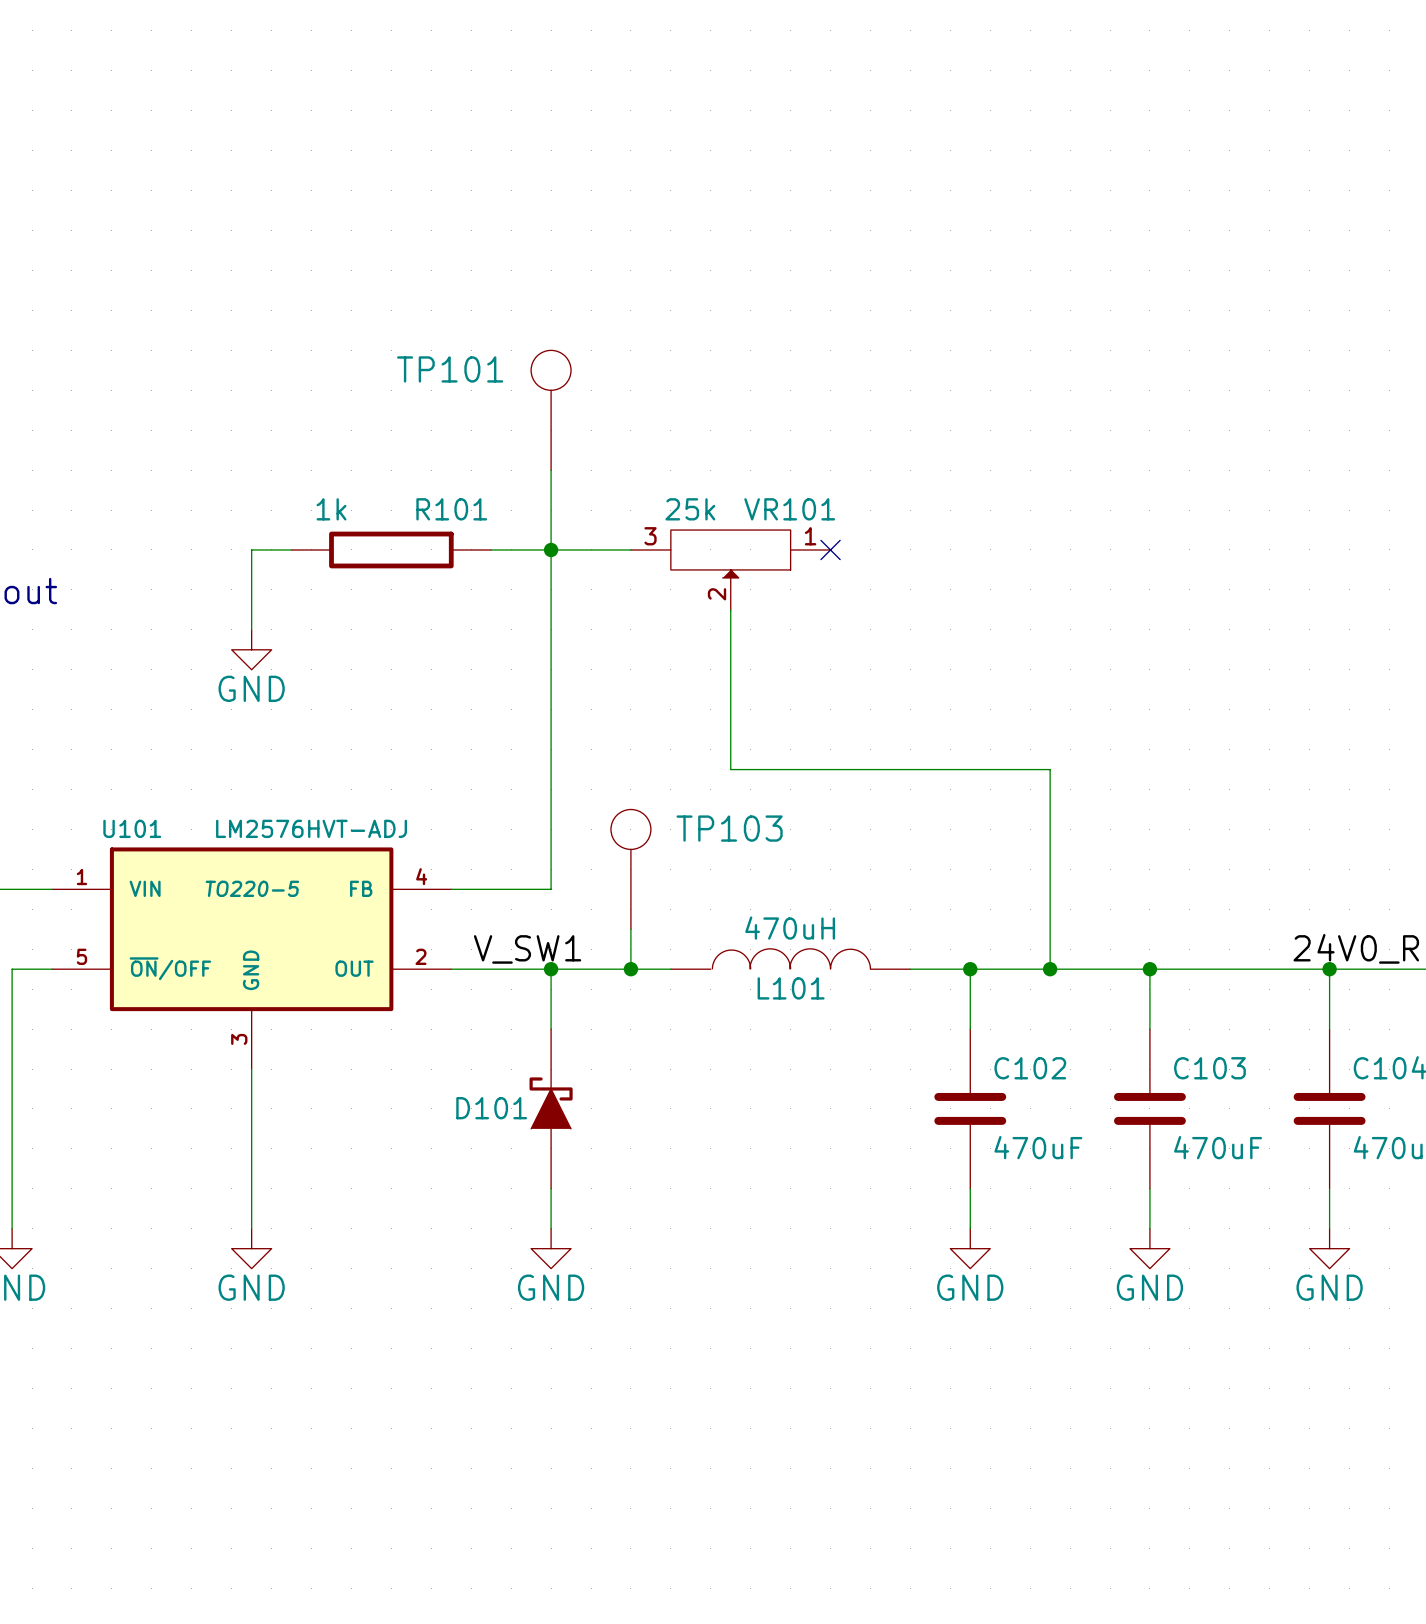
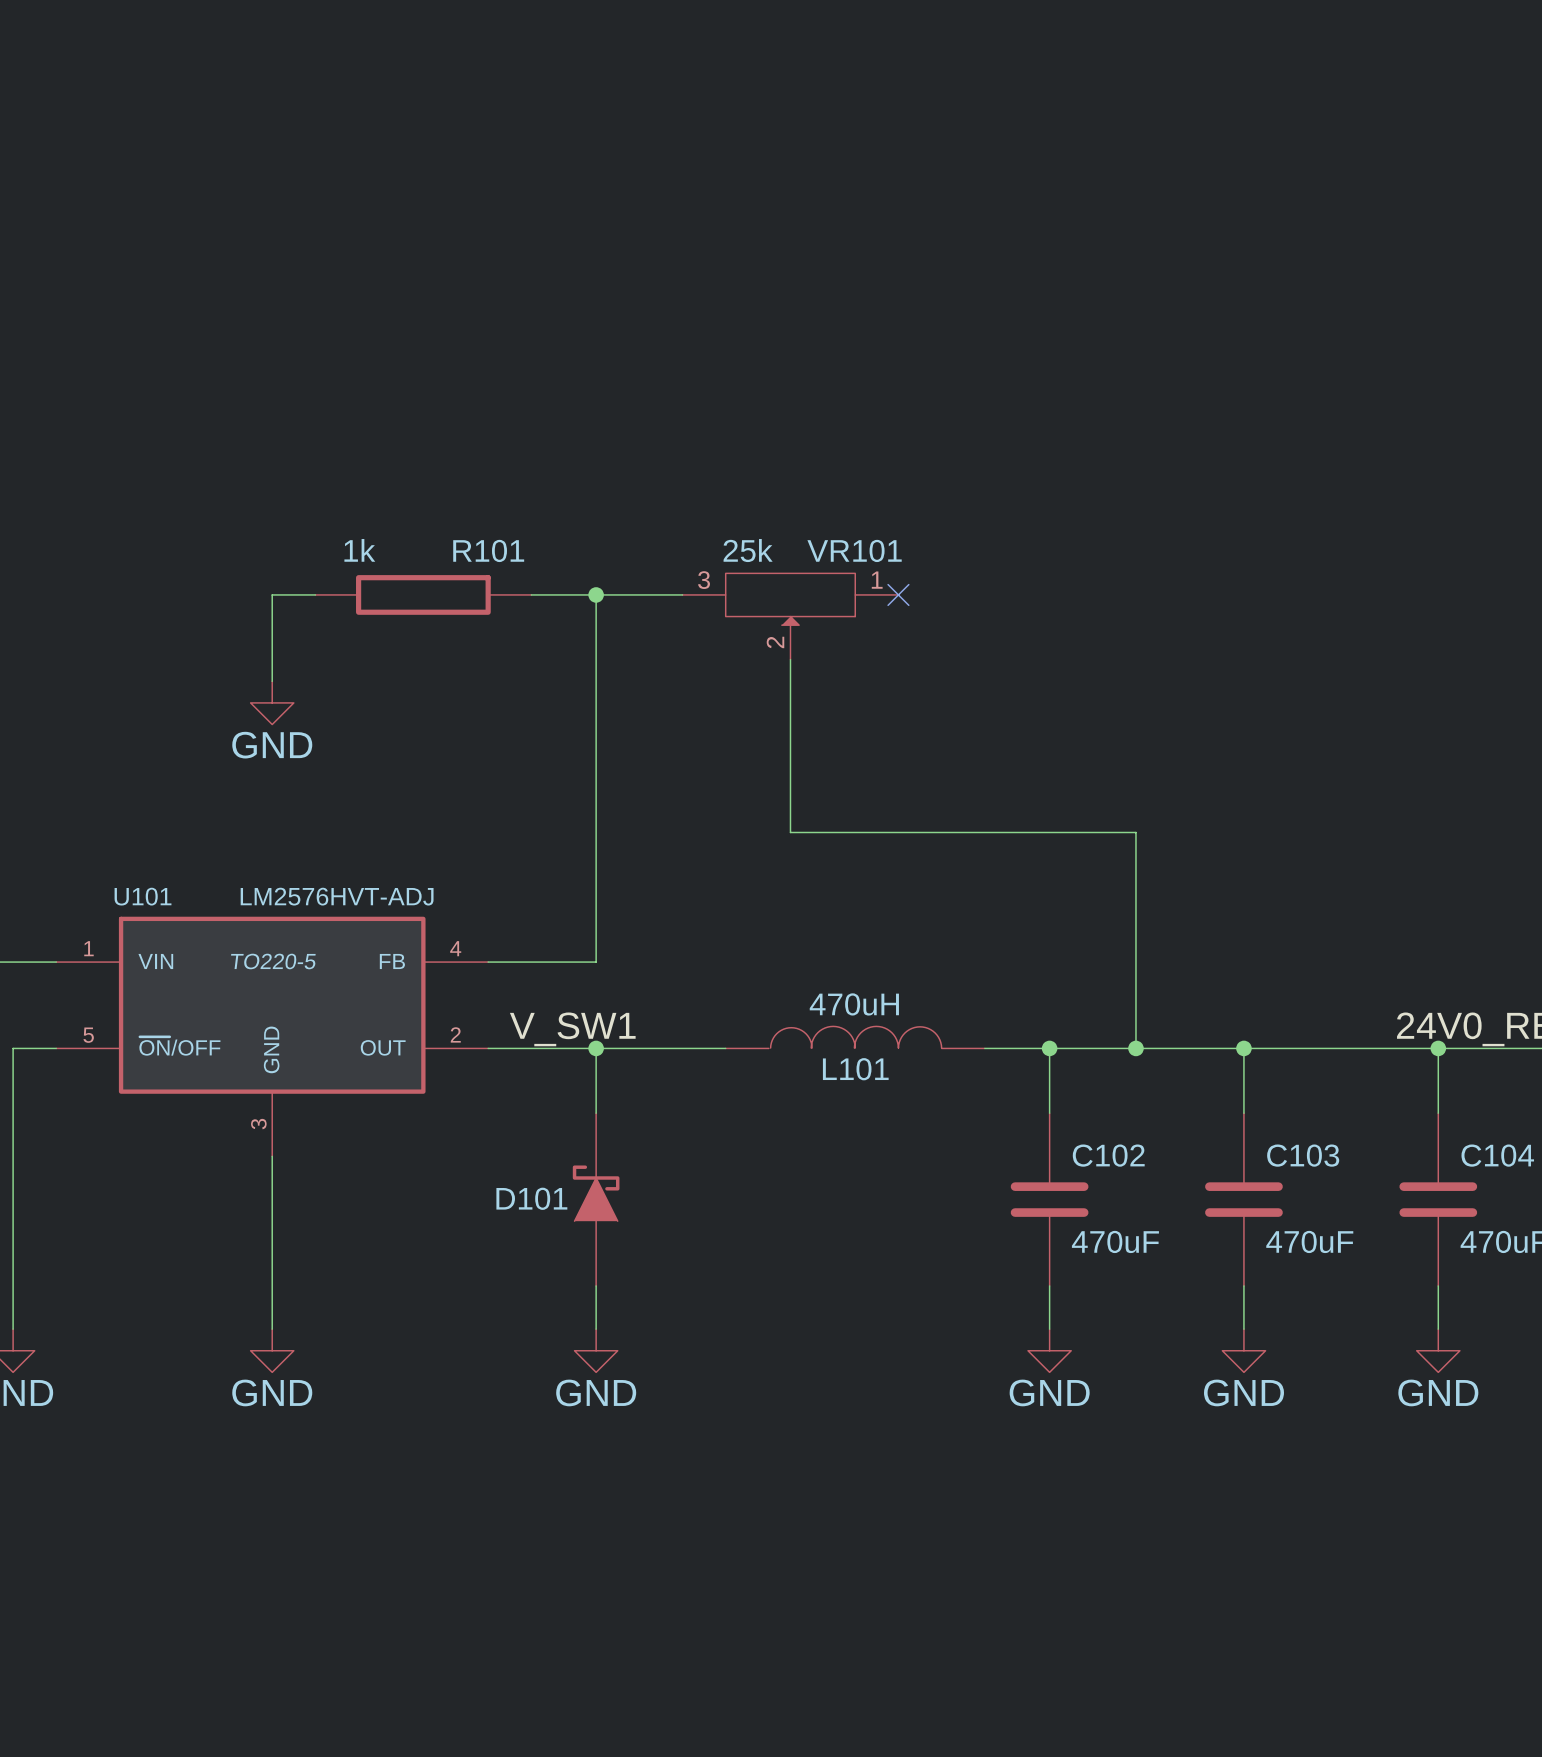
TP101: (551, 410) -> none
wire: (551, 470) (551, 549) -> none
TP103: (630, 869) -> none
wire: (630, 929) (630, 969) -> none
junction: (630, 969) -> none

